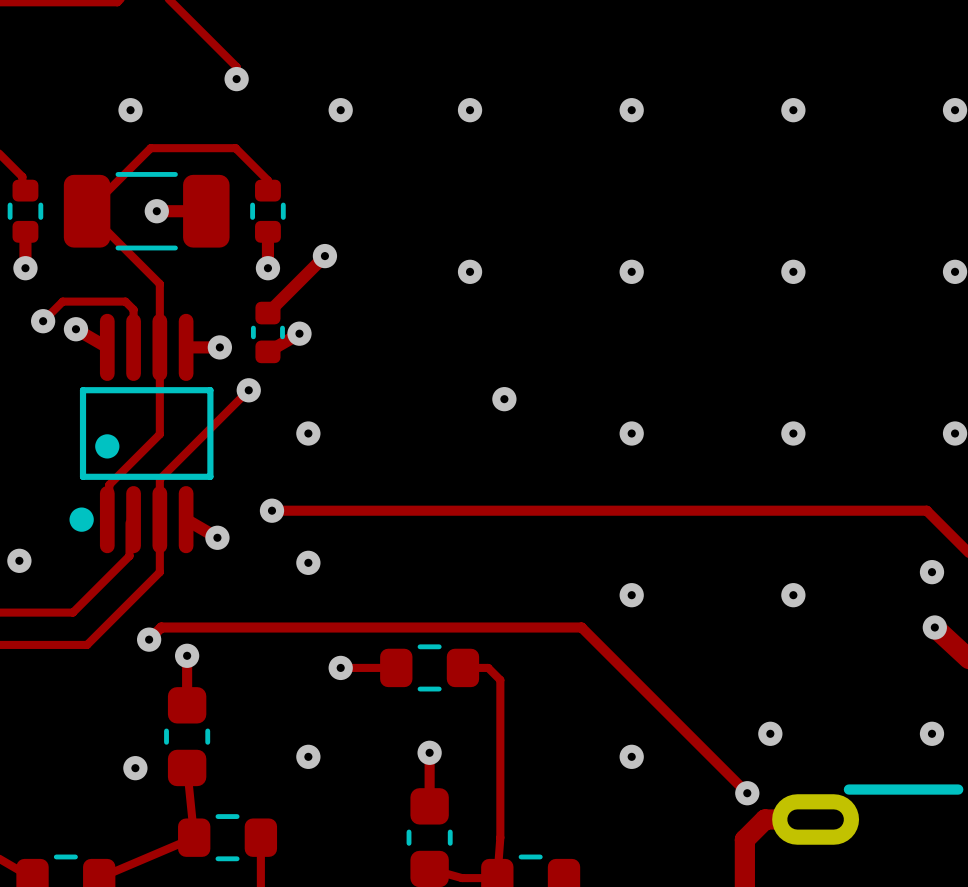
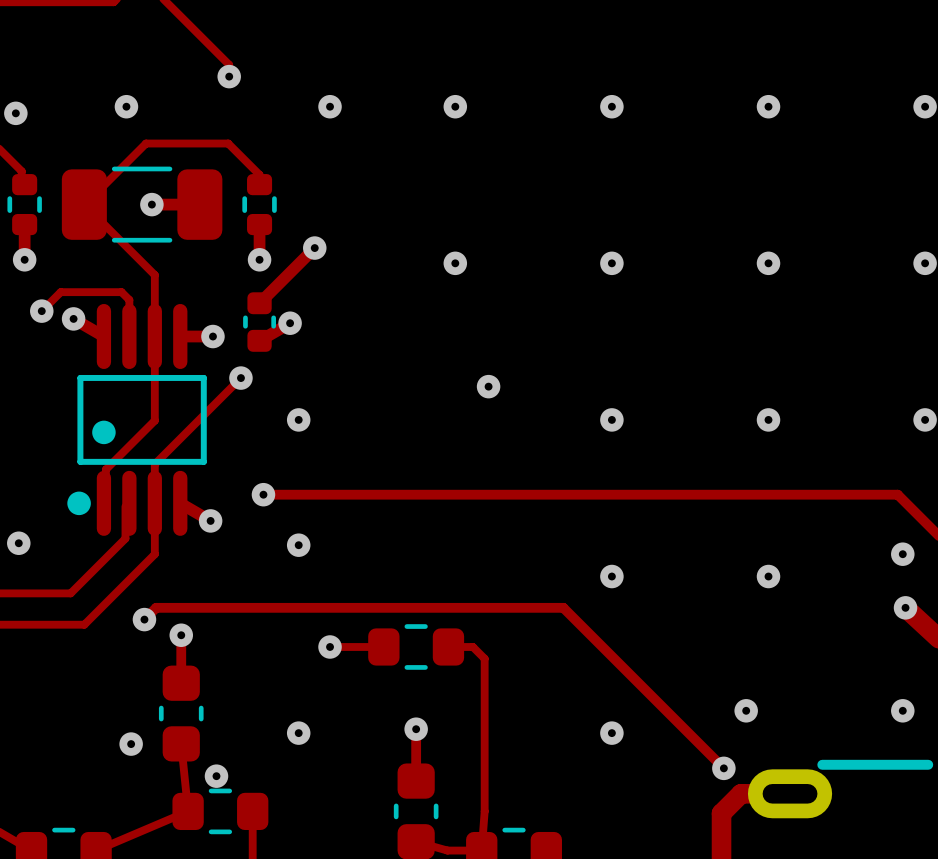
via: none -> (15, 113)
via: none -> (216, 776)

